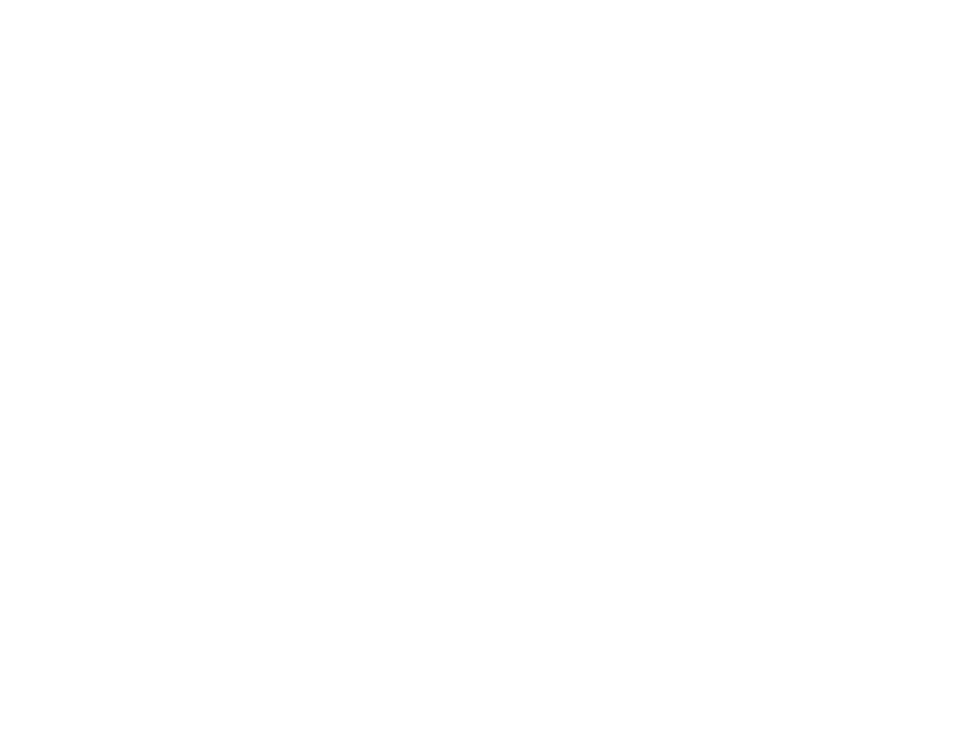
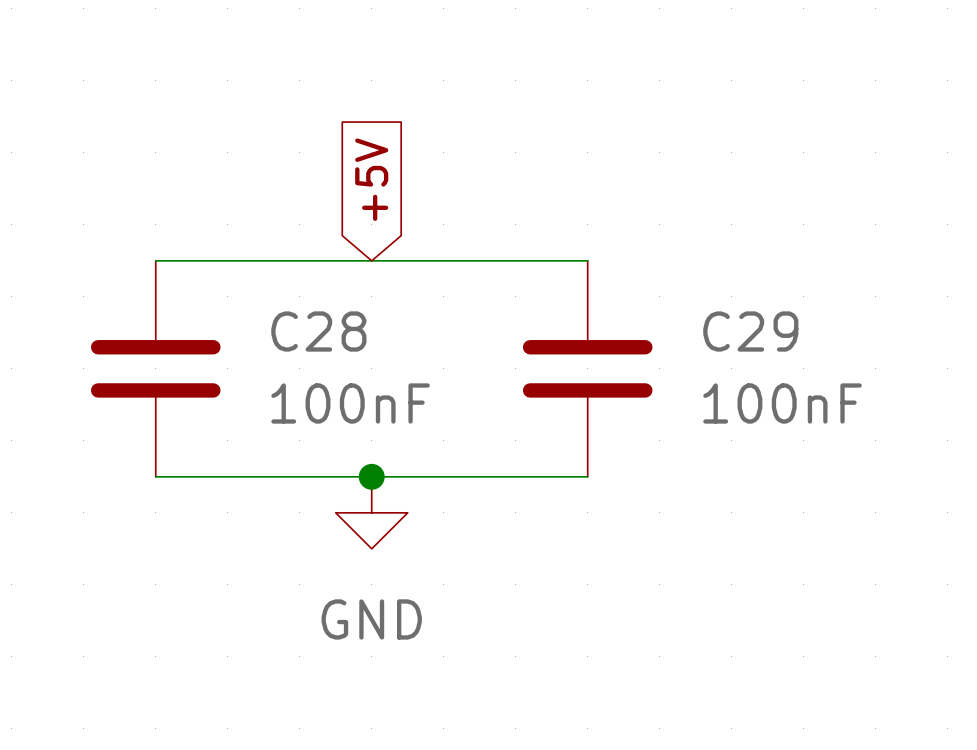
global label: none -> +5V (371, 179)
wire: none -> (155, 260) (587, 260)
C28: none -> 100nF (155, 368)
C29: none -> 100nF (587, 368)
wire: none -> (155, 476) (587, 476)
junction: none -> (371, 476)
power symbol: none -> GND (371, 512)

